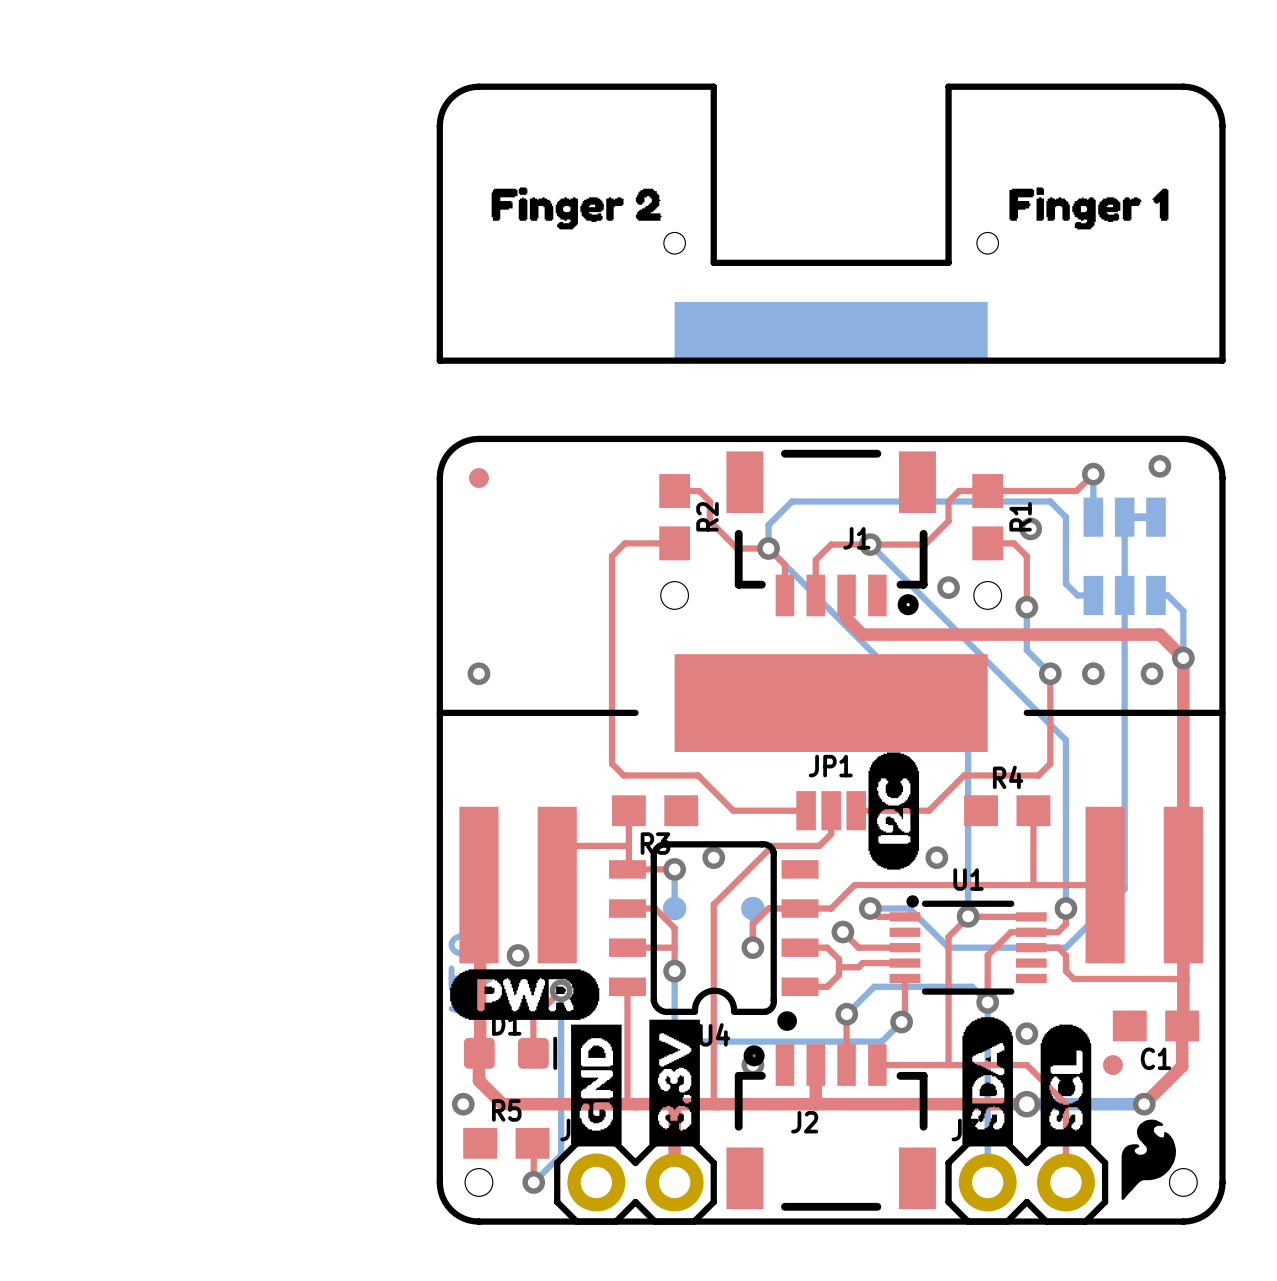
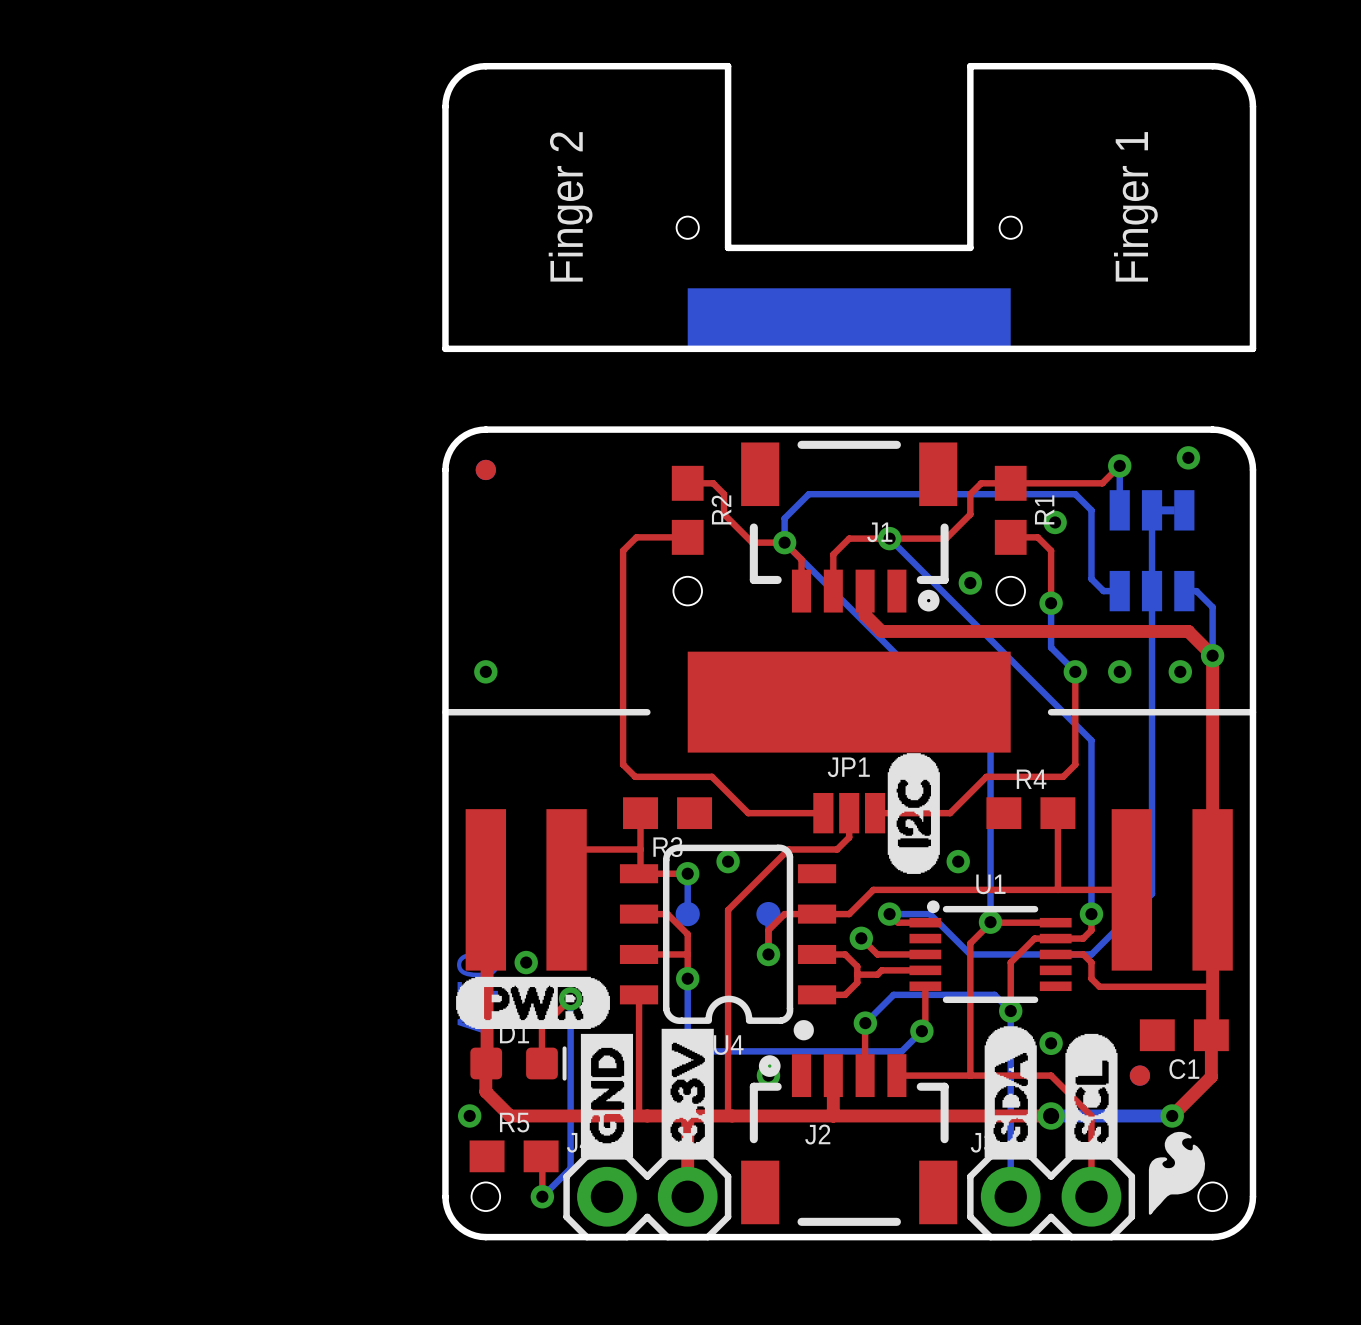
drawing: [491, 187, 662, 230] -> none
drawing: [1009, 187, 1169, 230] -> none
text: none -> Finger 2 (570, 206)
text: none -> Finger 1 (1135, 206)

